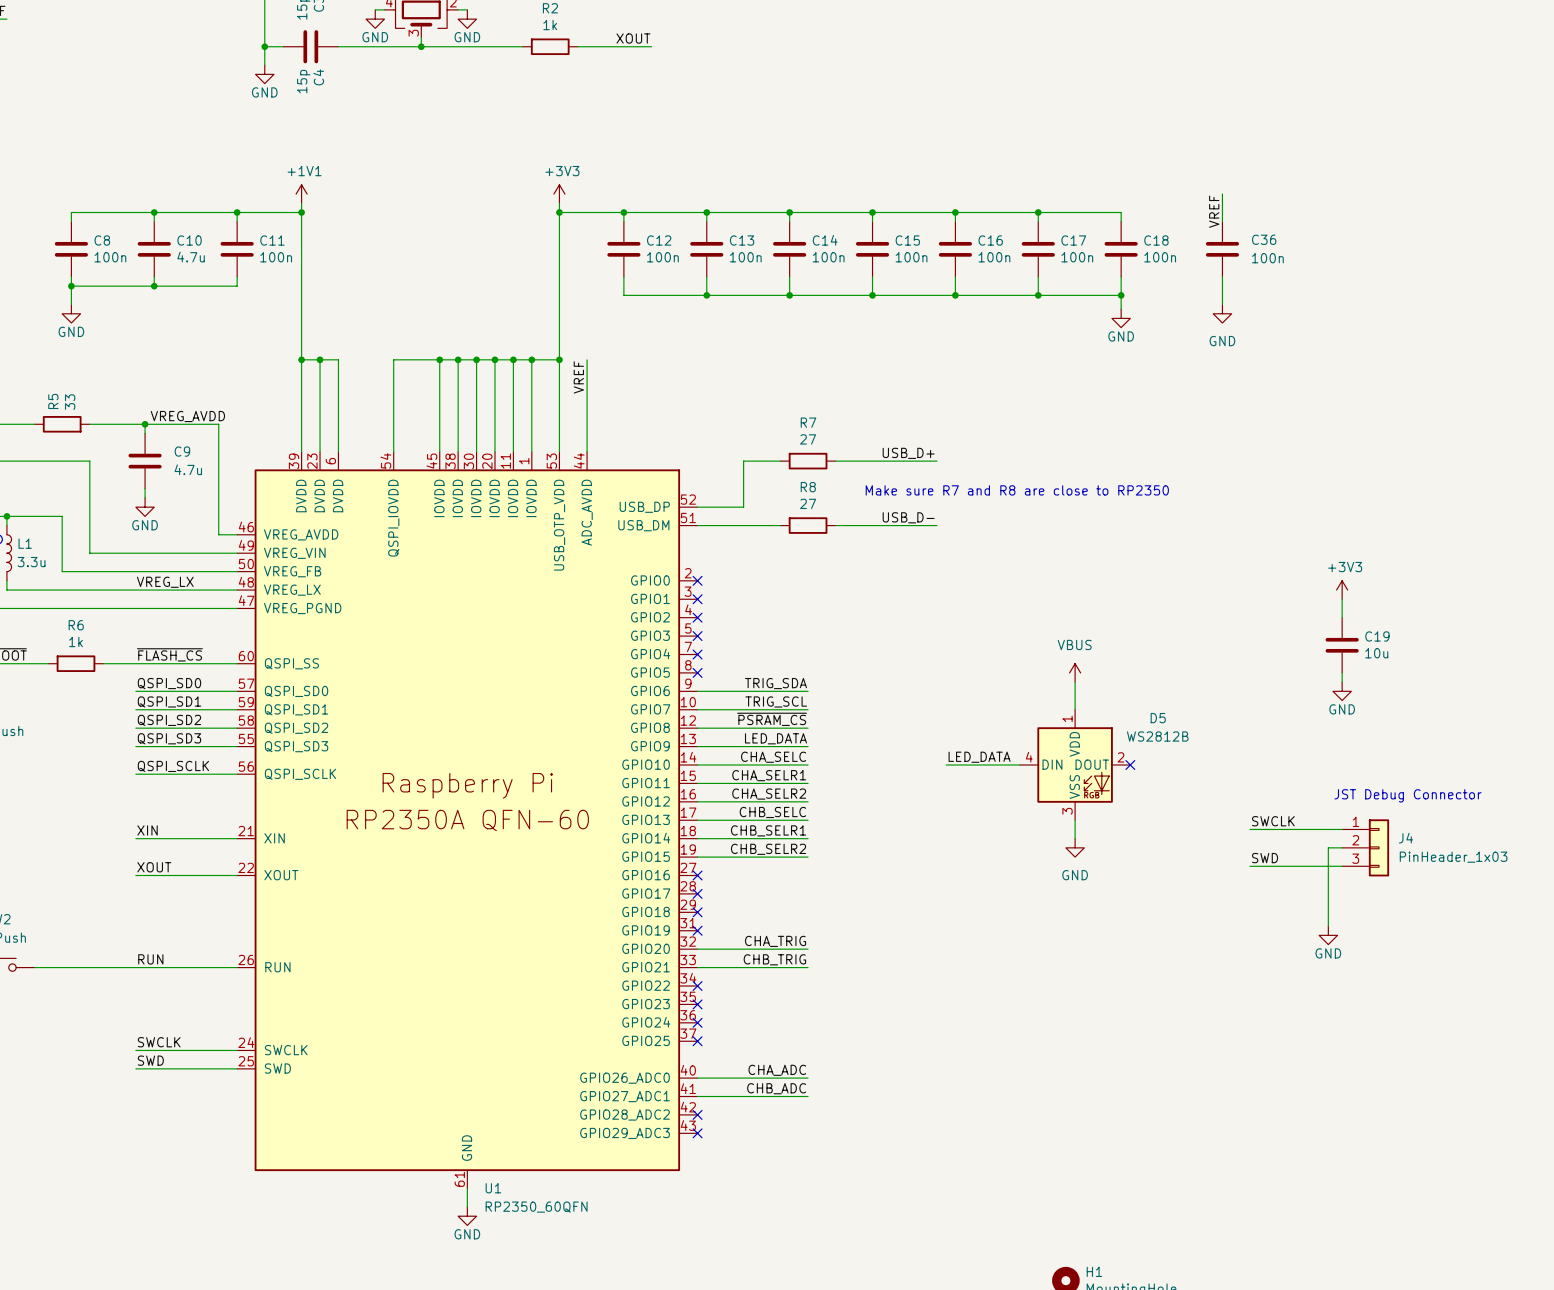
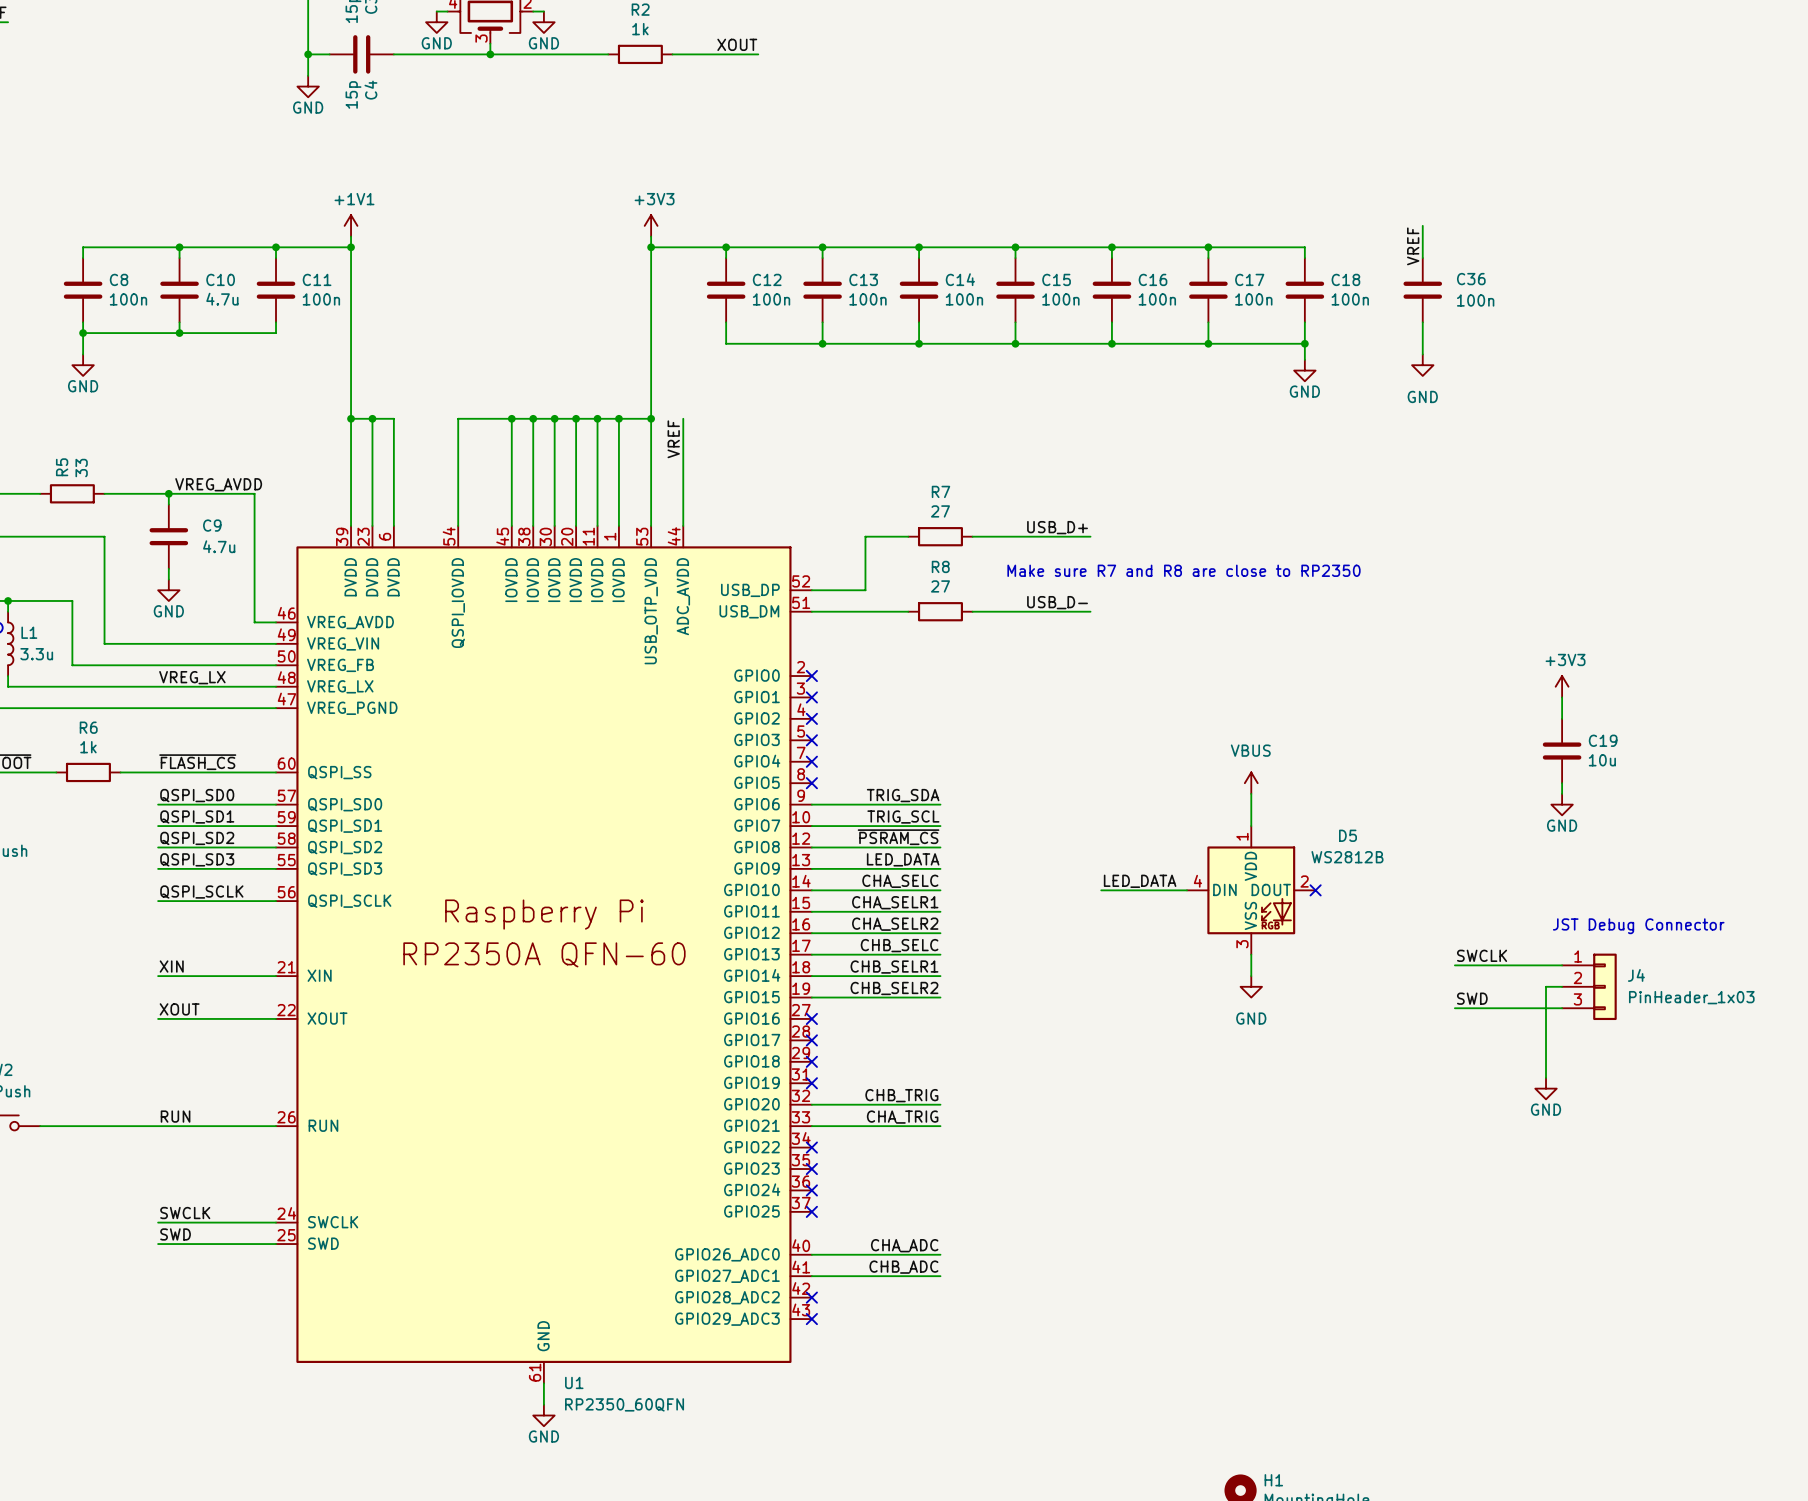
label: CHA_TRIG (775, 941) -> CHB_TRIG (901, 1095)
label: CHB_TRIG (774, 959) -> CHA_TRIG (902, 1117)

